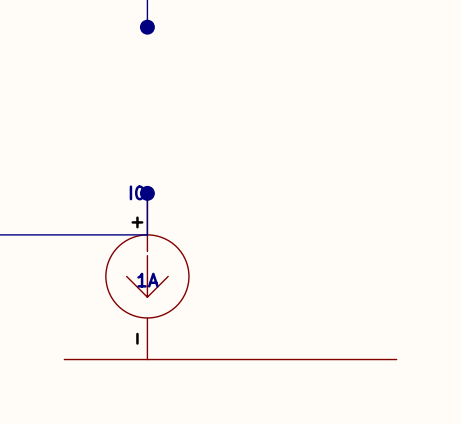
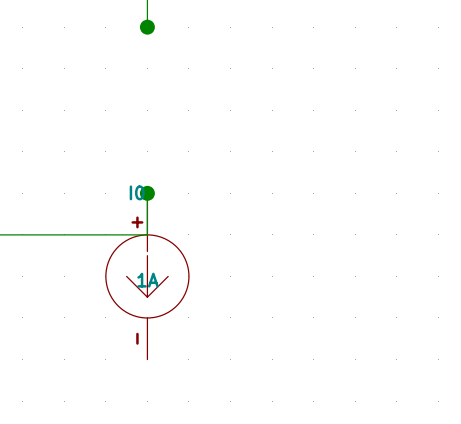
part: (230, 359) -> none

